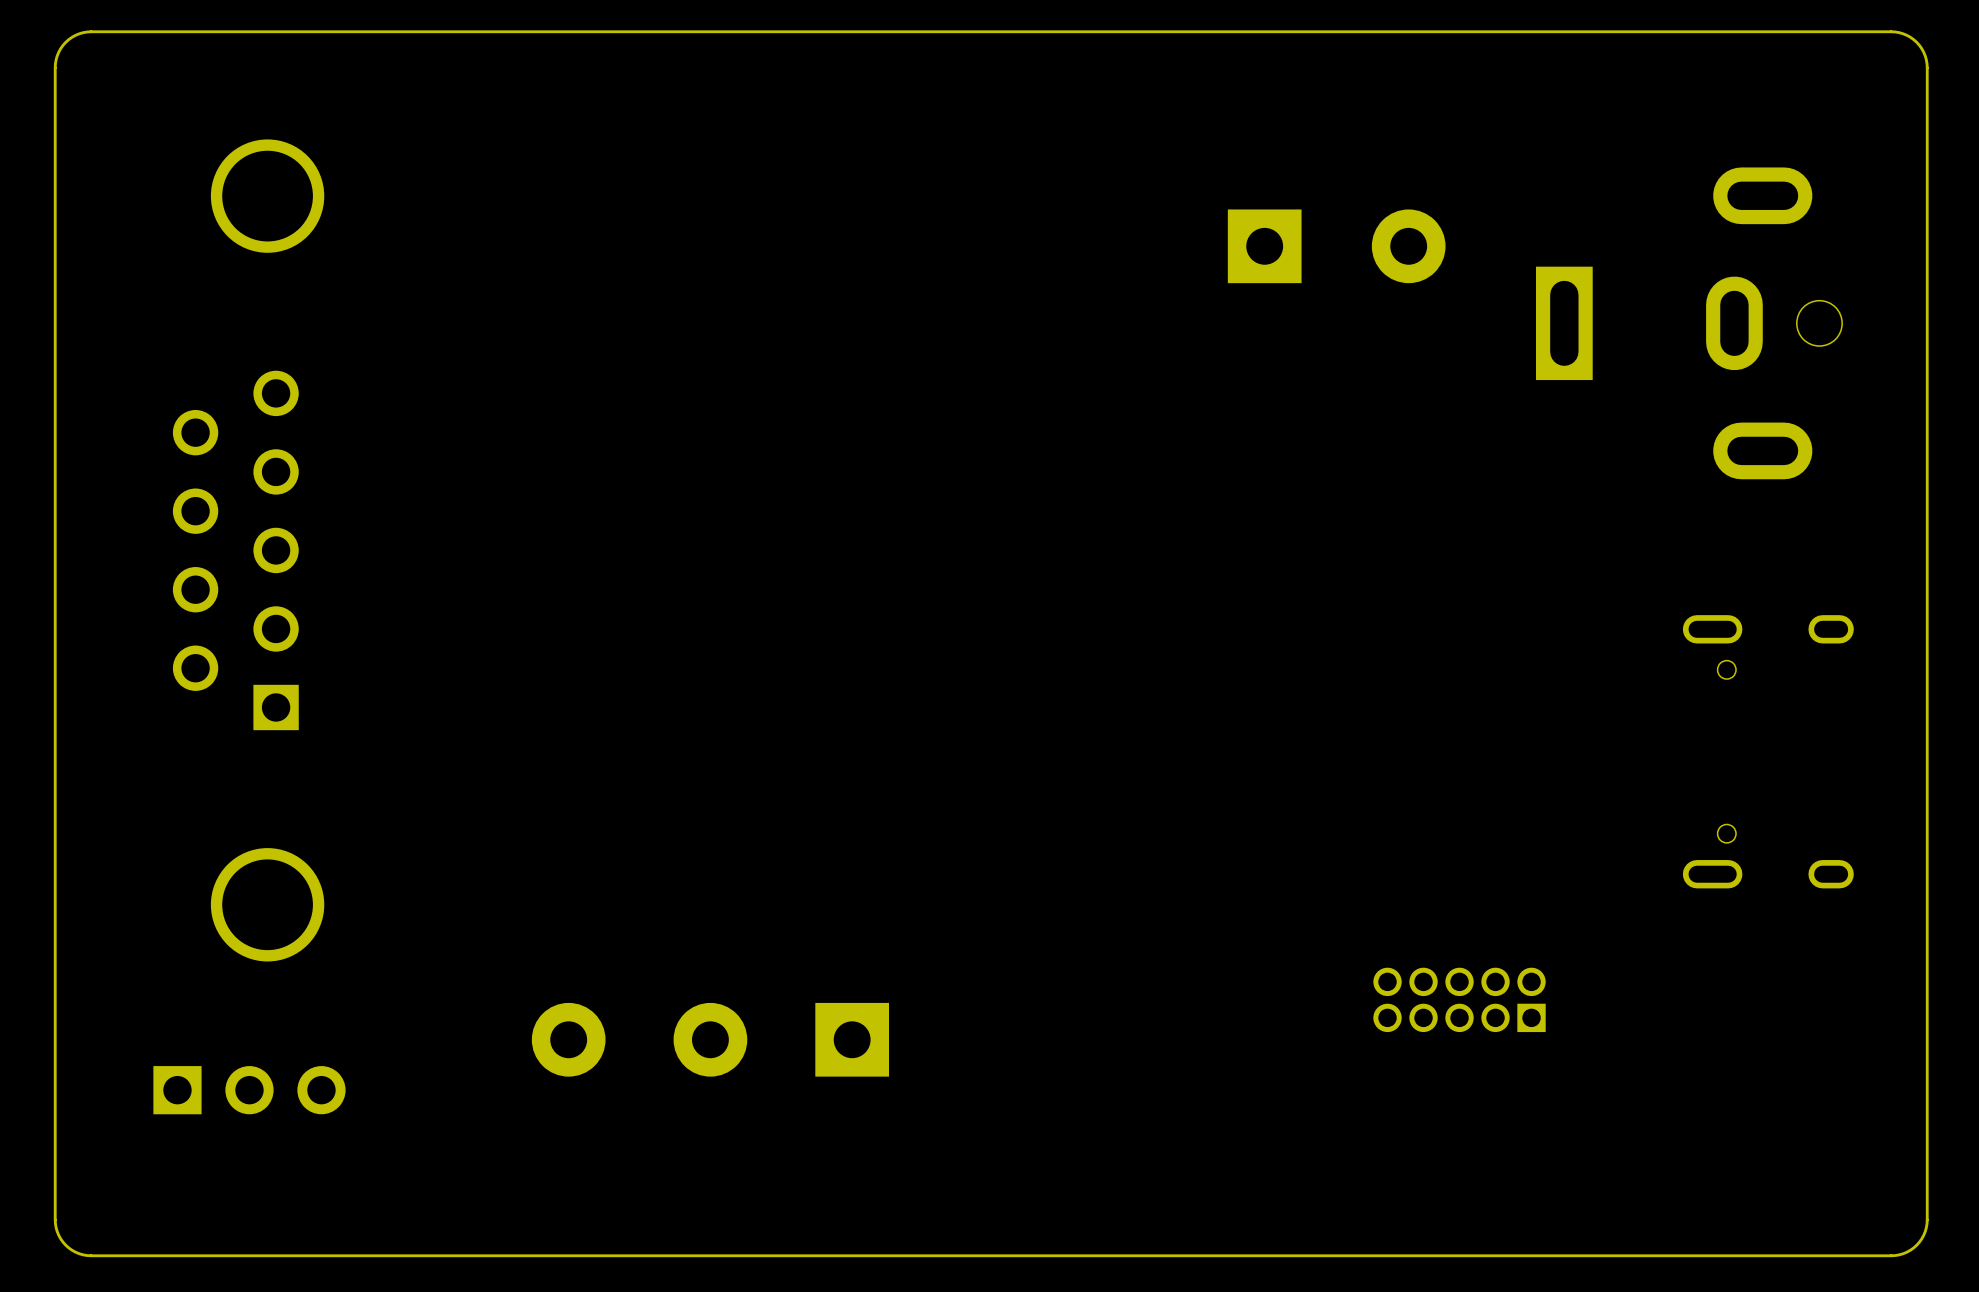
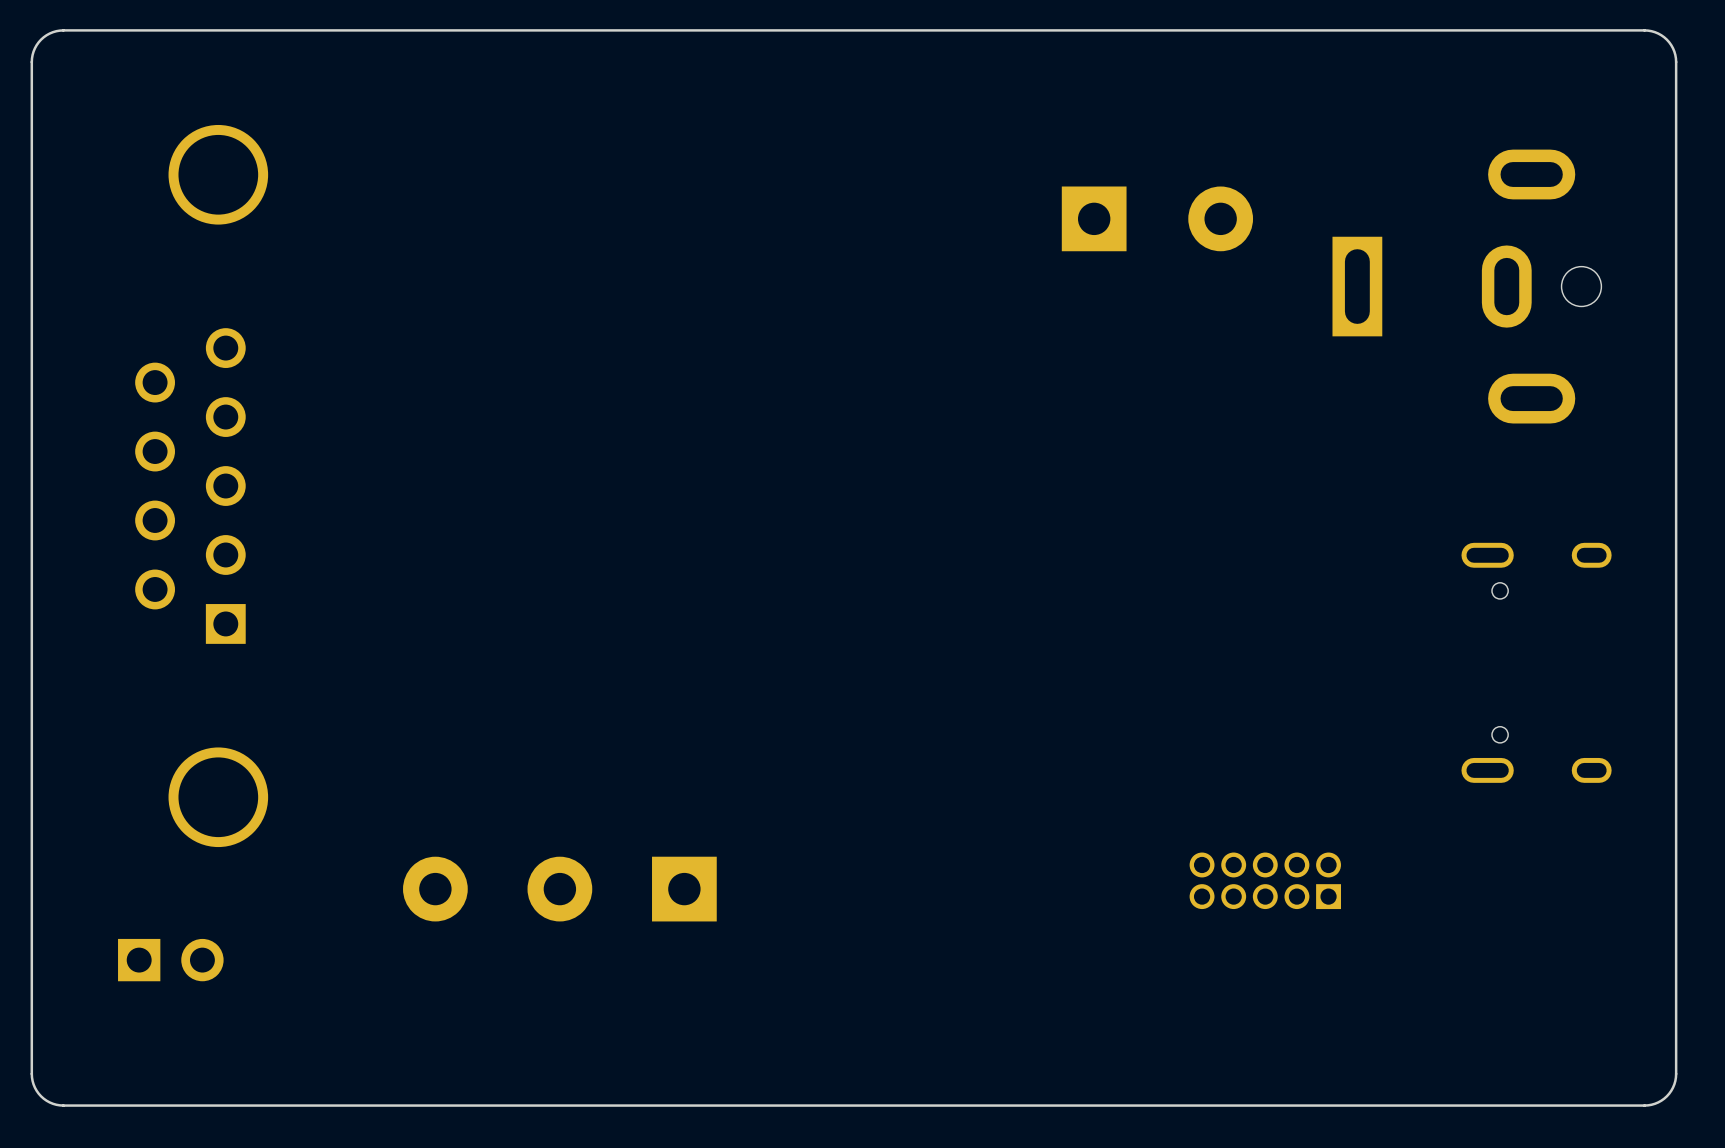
part position: (710, 1039) -> (559, 889)
part: (249, 1090) -> none

